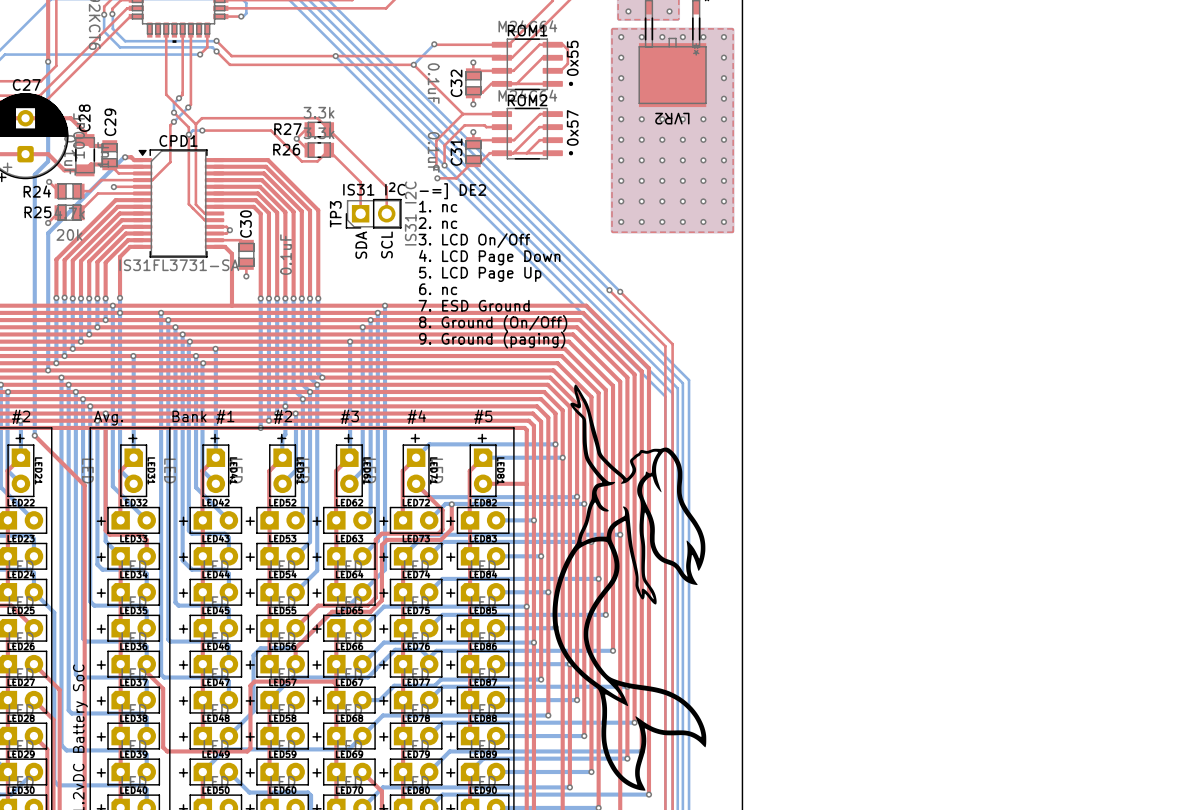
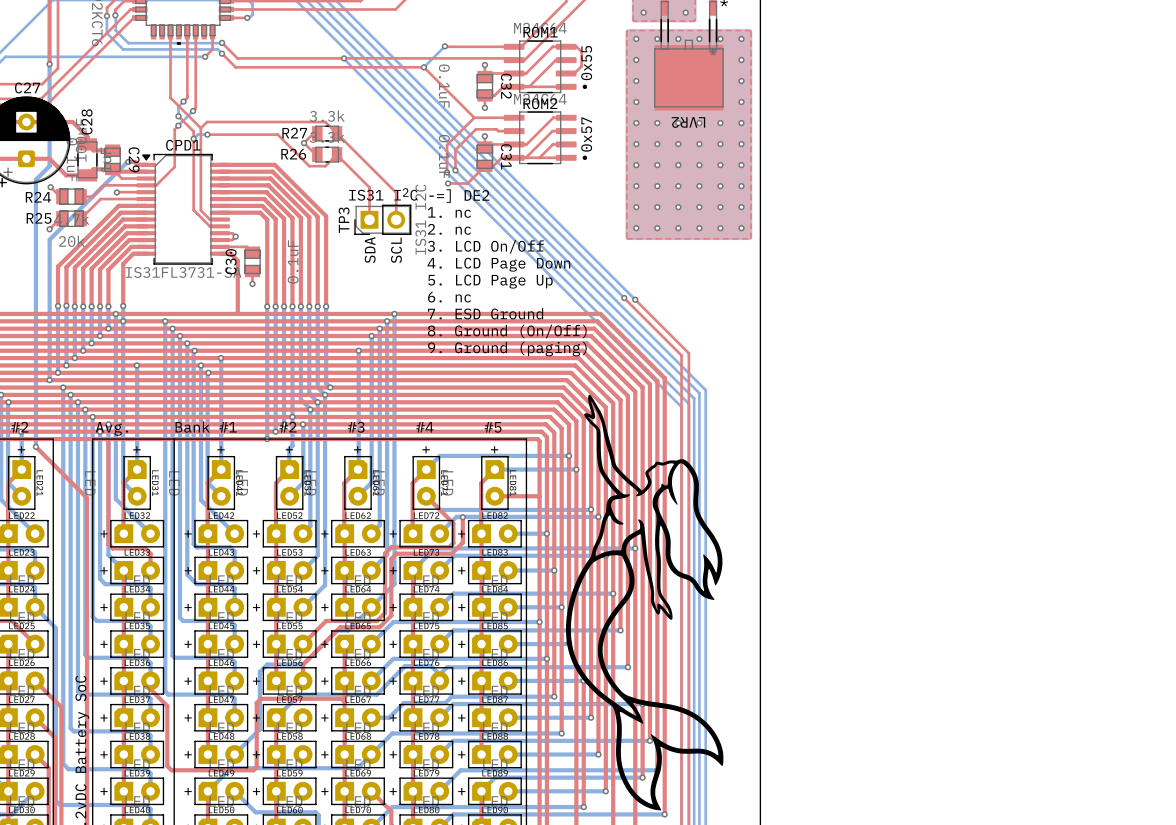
C32 name rotation: 0° (456, 83) -> 180° (506, 86)
C32 name position: C32 (456, 83) -> C32 (506, 86)
C29 name rotation: 0° (110, 122) -> 180° (134, 159)
C29 name position: C29 (110, 122) -> C29 (134, 159)
C31 name rotation: 0° (456, 152) -> 180° (506, 156)
C31 name position: C31 (456, 152) -> C31 (506, 156)
C30 name position: C30 (245, 224) -> C30 (231, 261)

